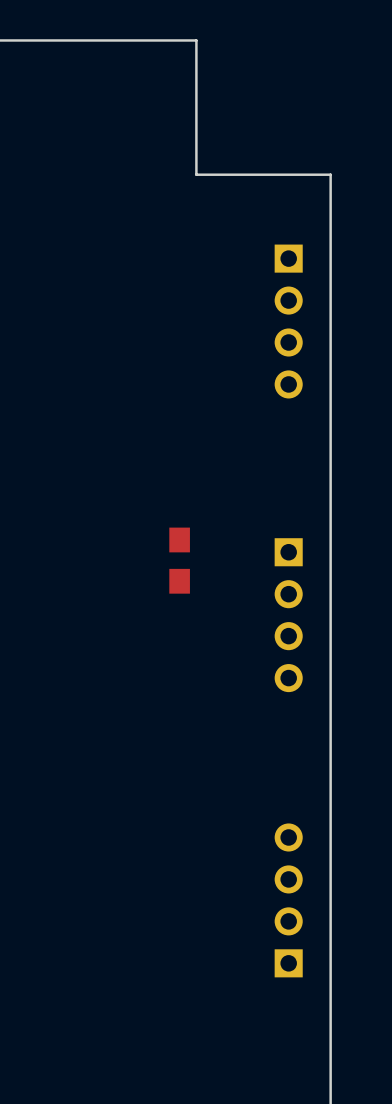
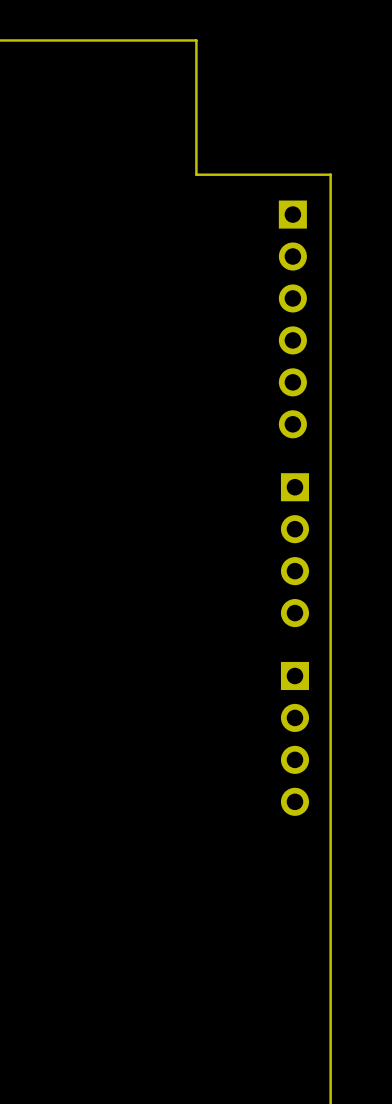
part footprint: [274, 244, 303, 399] -> [278, 200, 307, 439]
part: none -> (294, 550)
part: (179, 560) -> none
part: (288, 615) -> none
part: none -> (294, 738)
part: (288, 900) -> none

